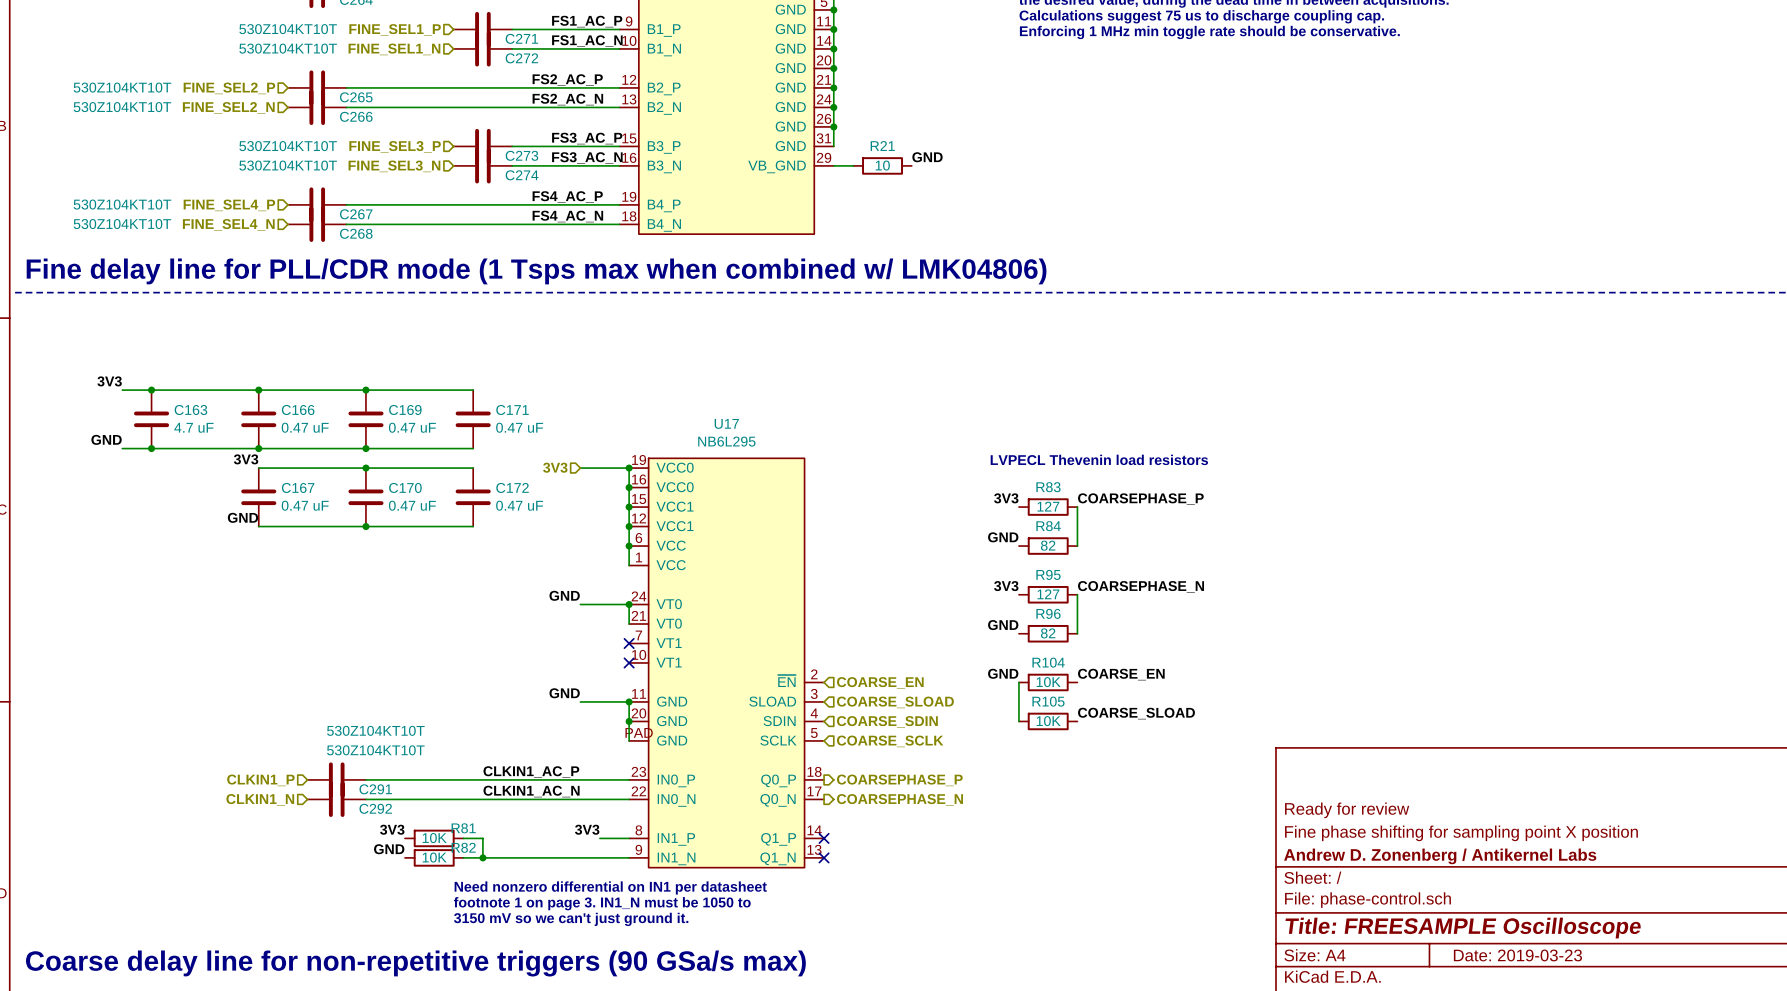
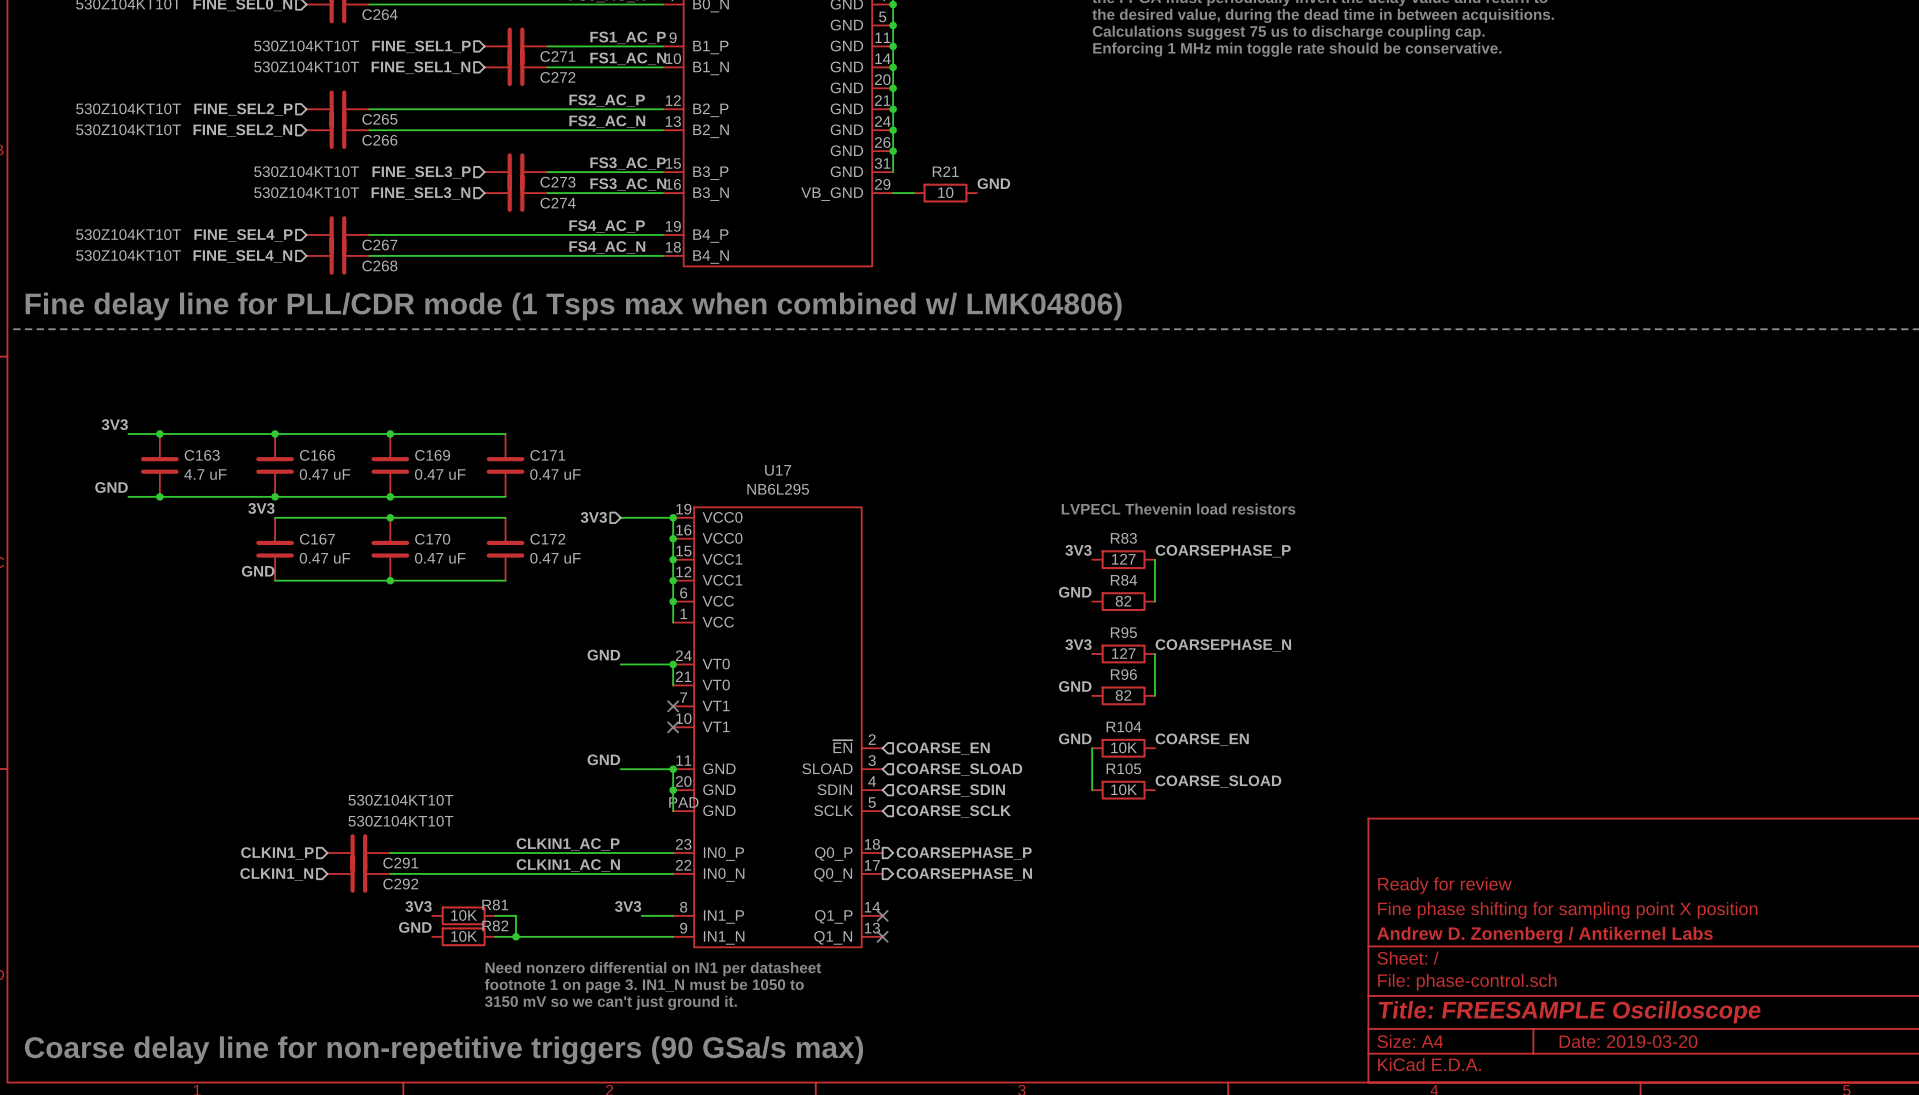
title block: Date: 2019-03-23 (1517, 955) -> Date: 2019-03-20 (1628, 1041)

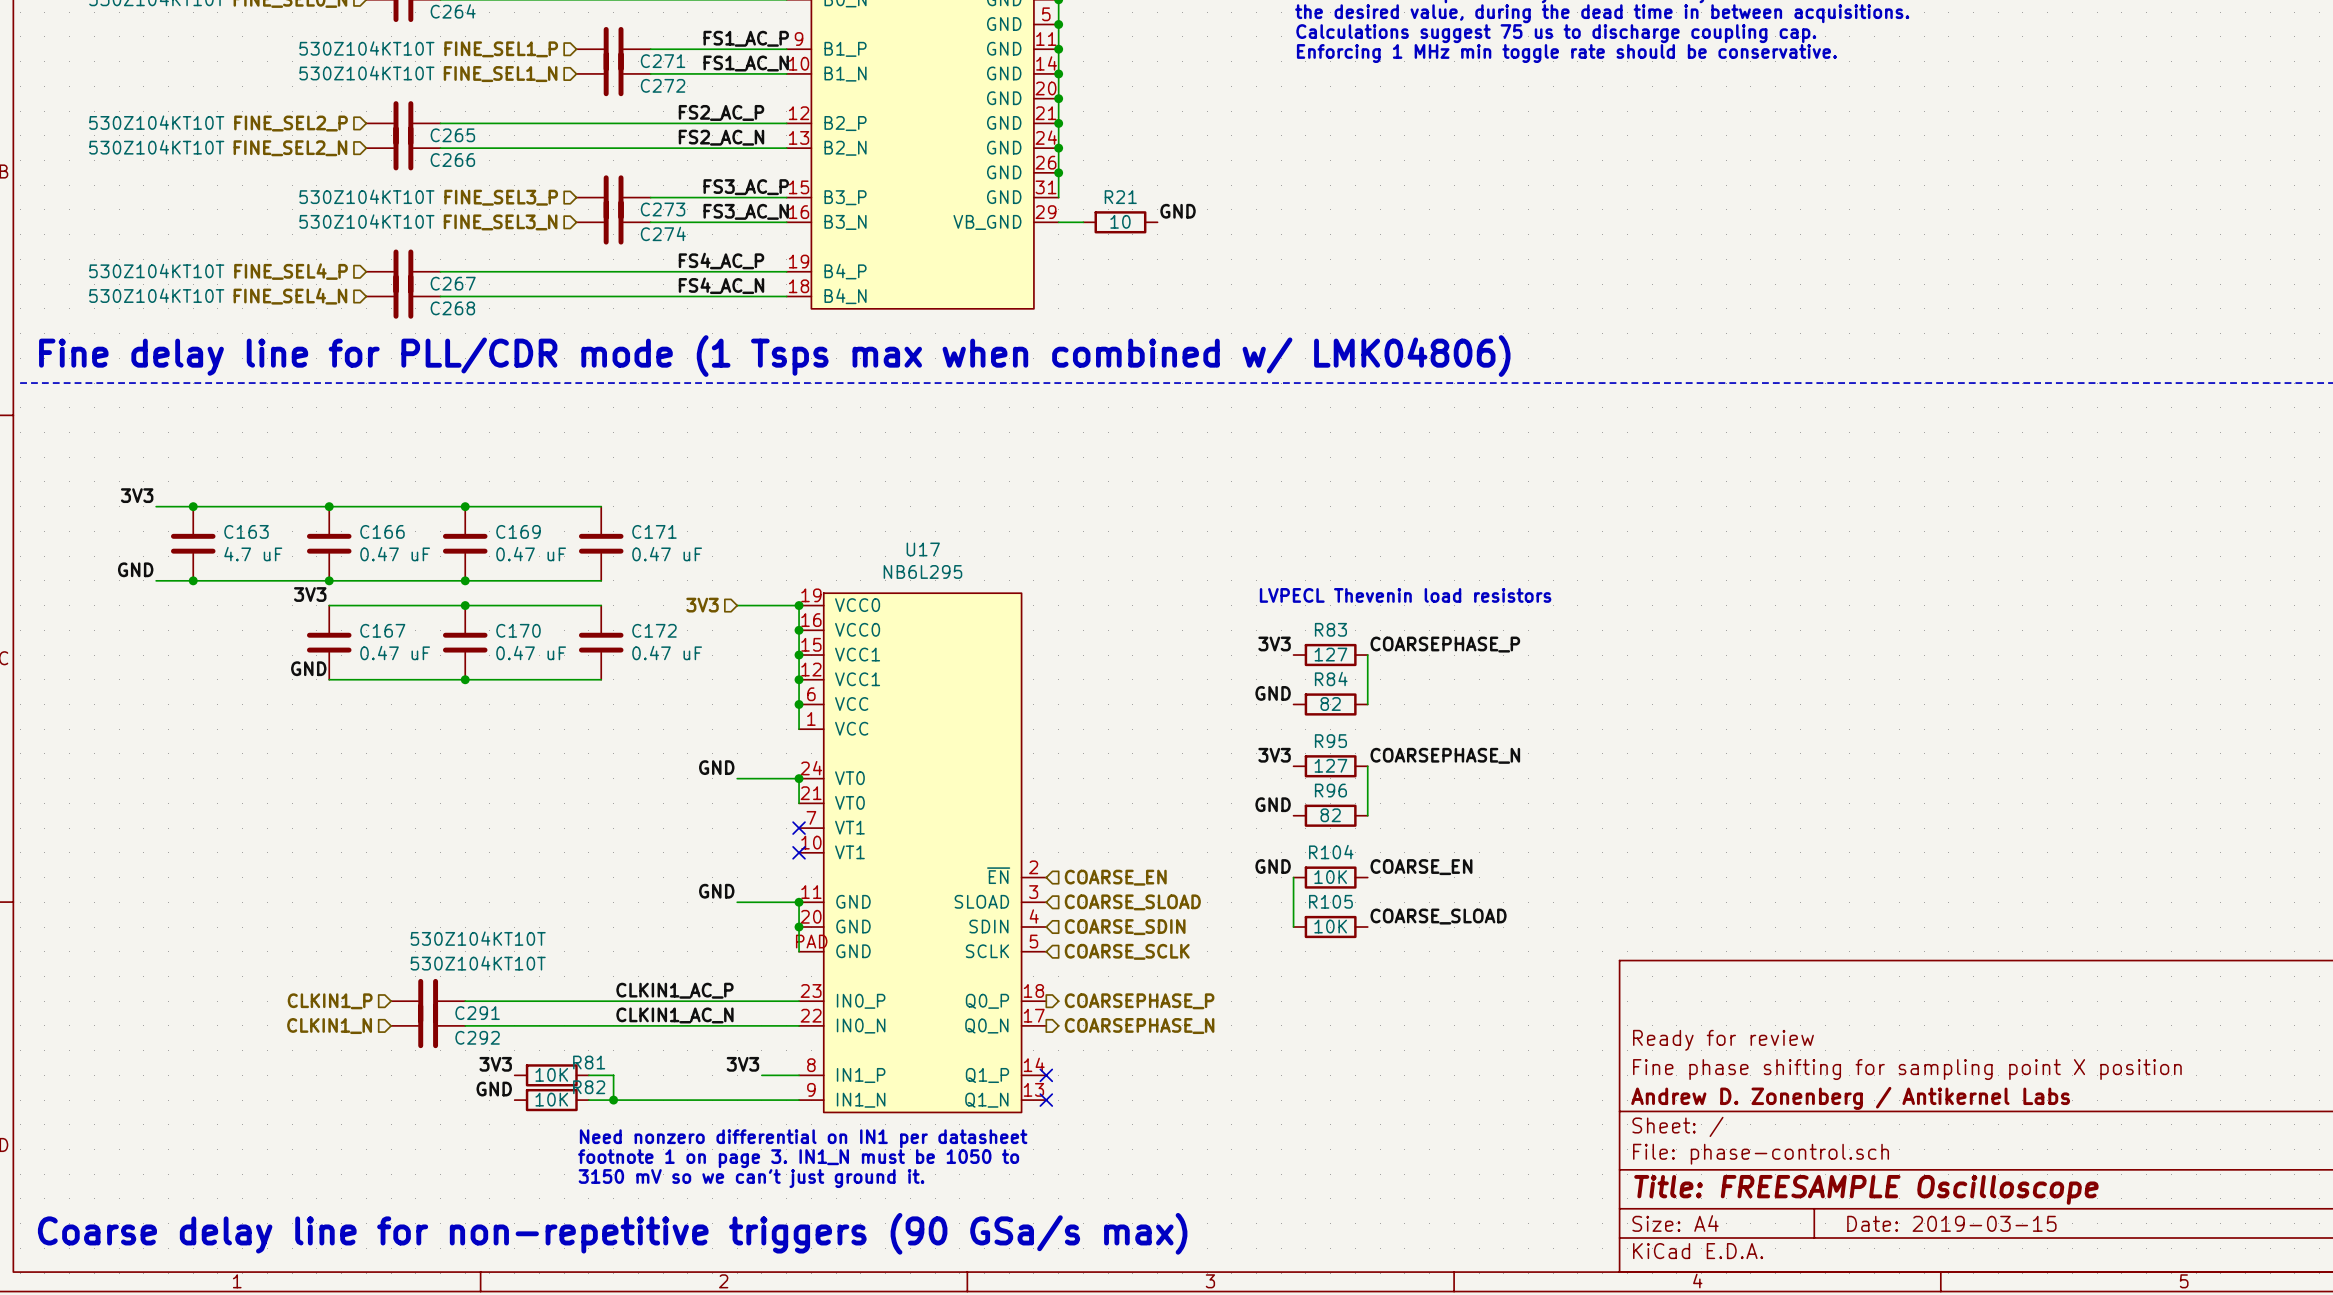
title block: Date: 2019-03-20 (1628, 1041) -> Date: 2019-03-15 (1951, 1223)

